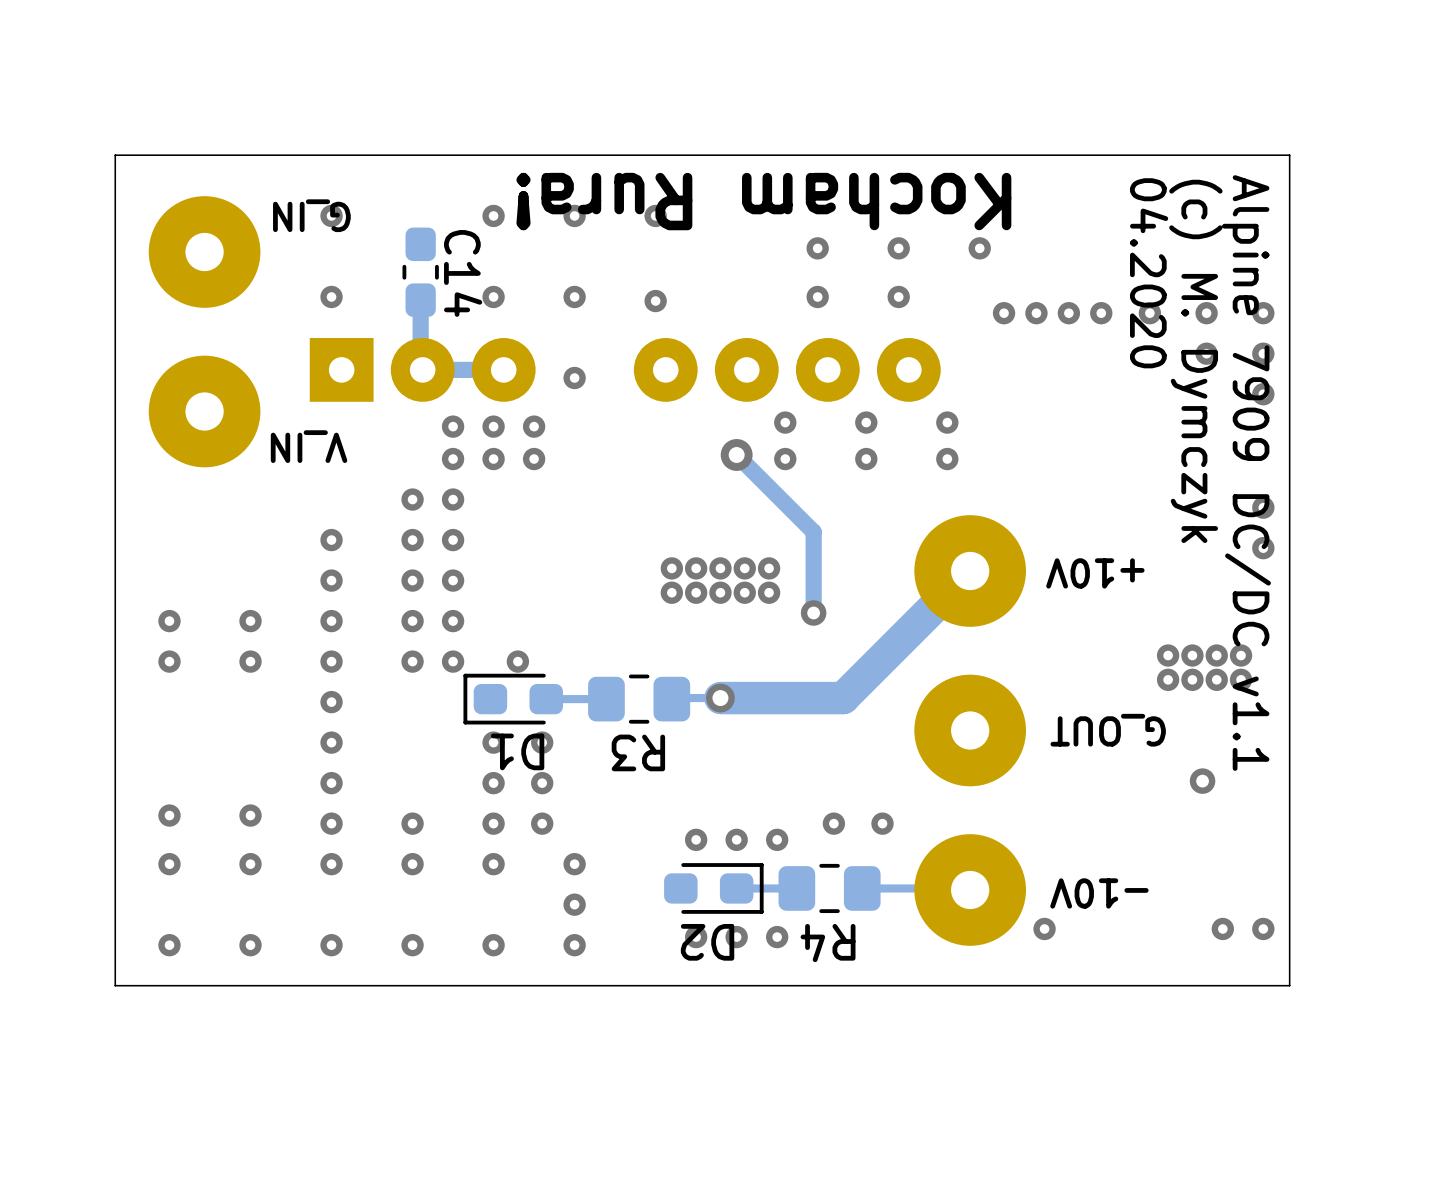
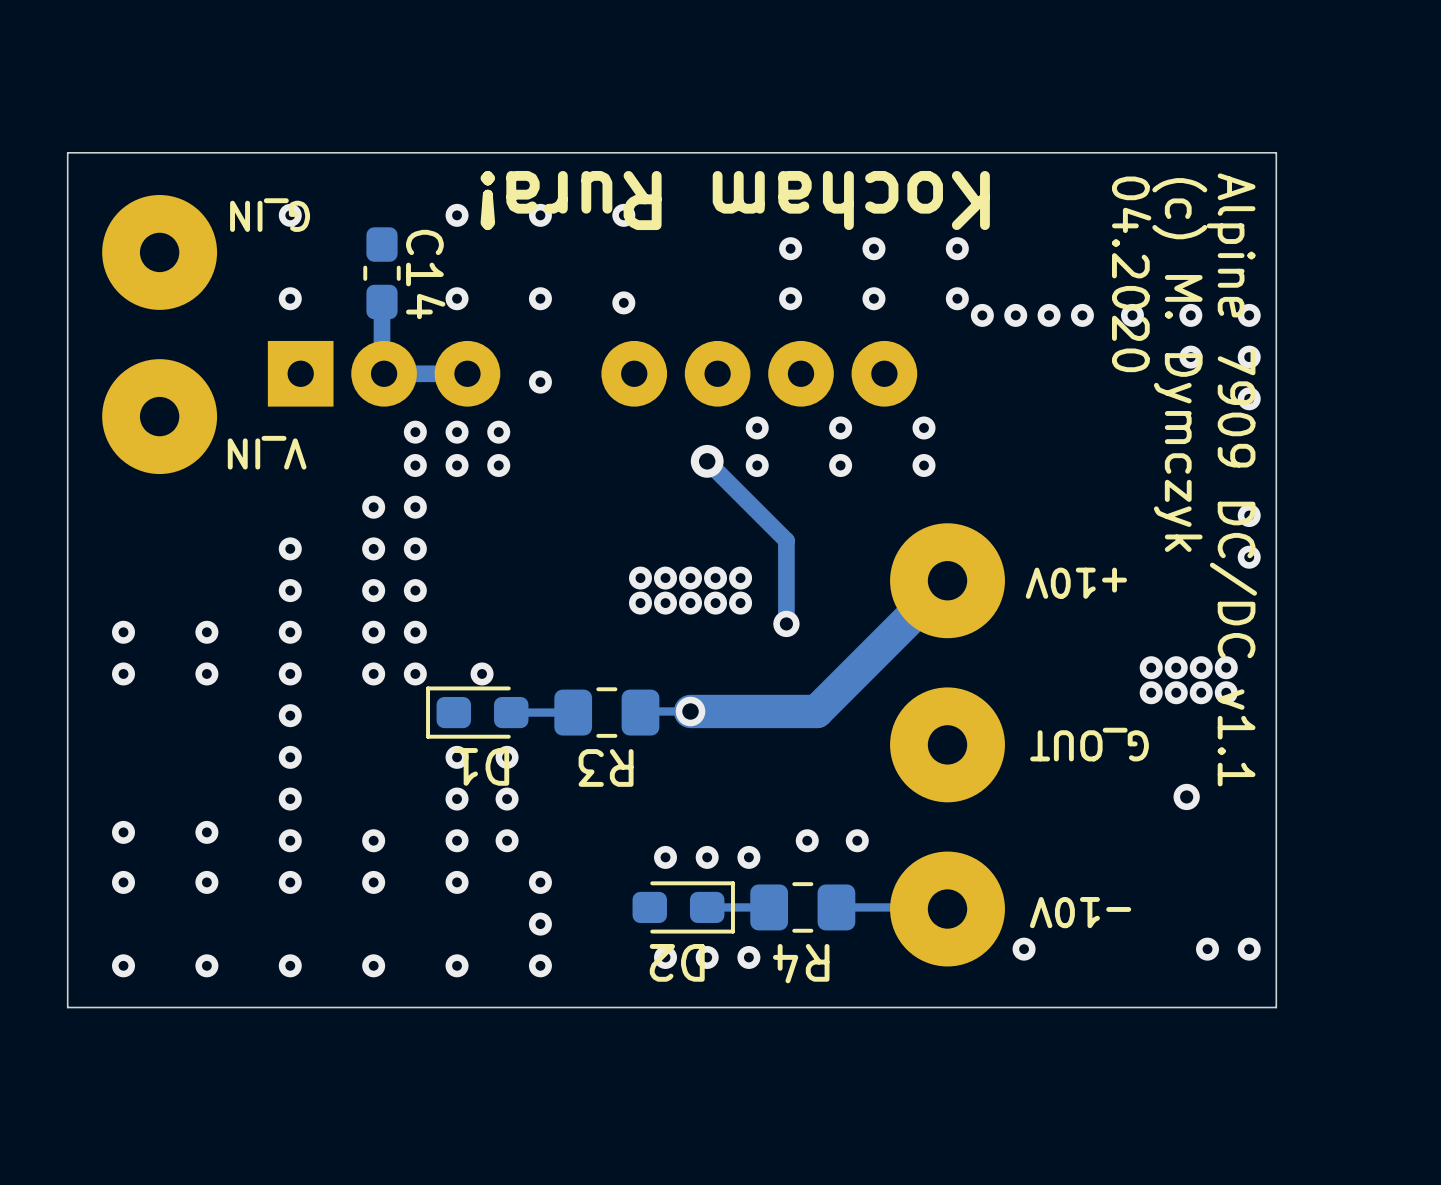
via: none -> (957, 298)

